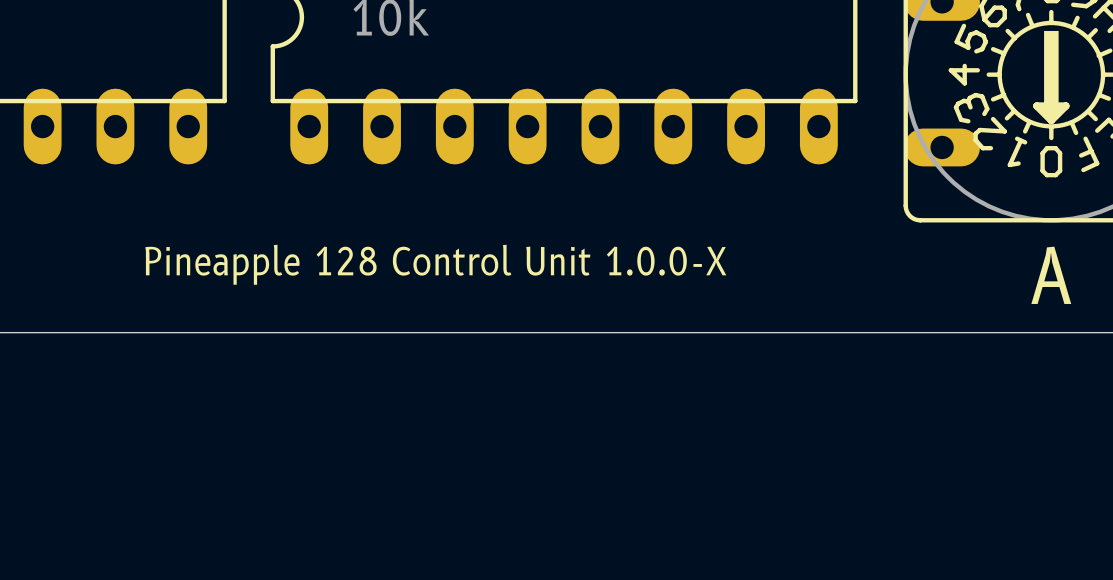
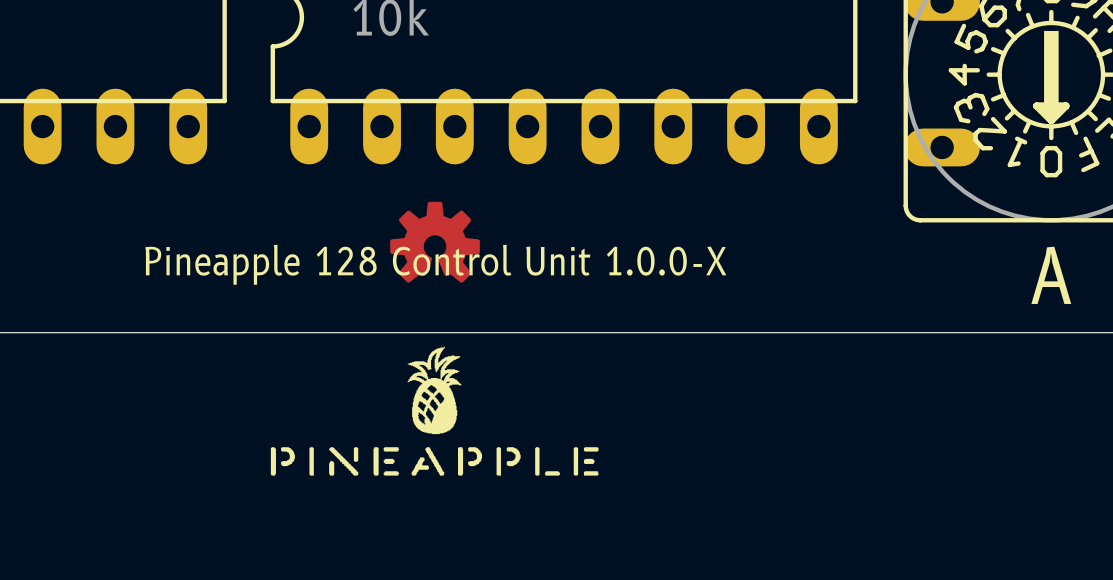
drawing: none -> [390, 201, 480, 283]
drawing: none -> [270, 346, 599, 476]

